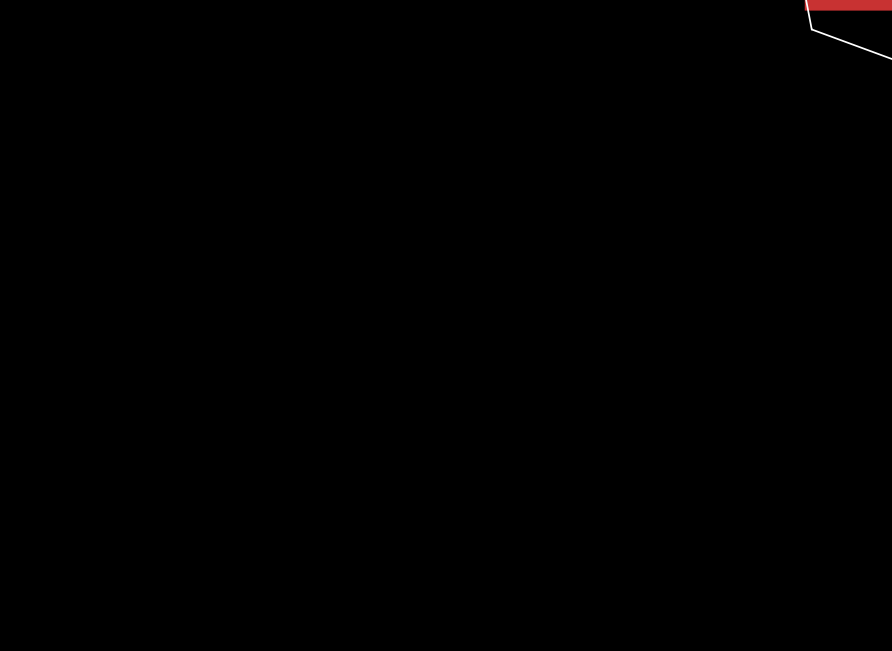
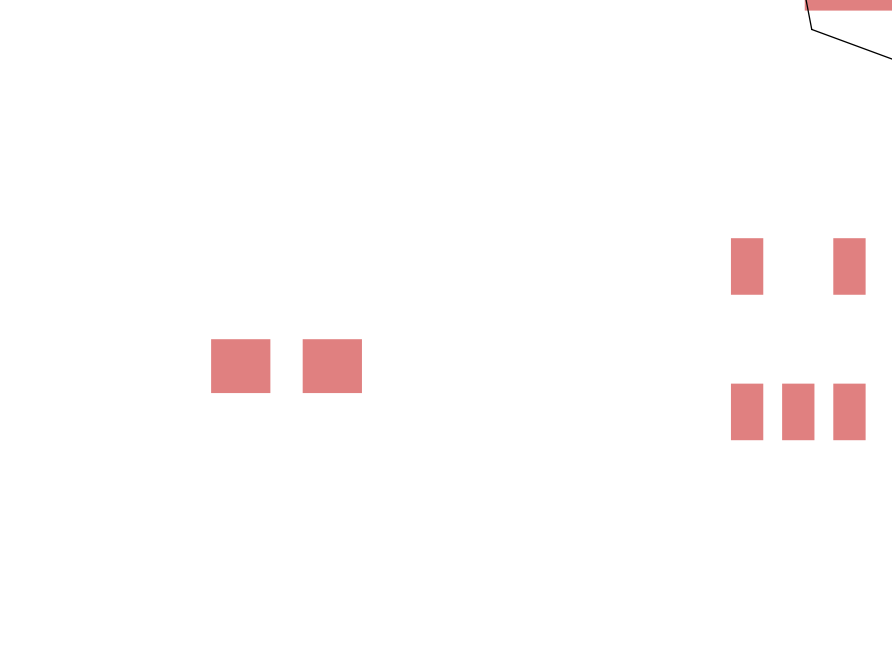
part: none -> (798, 339)
part: none -> (286, 366)

